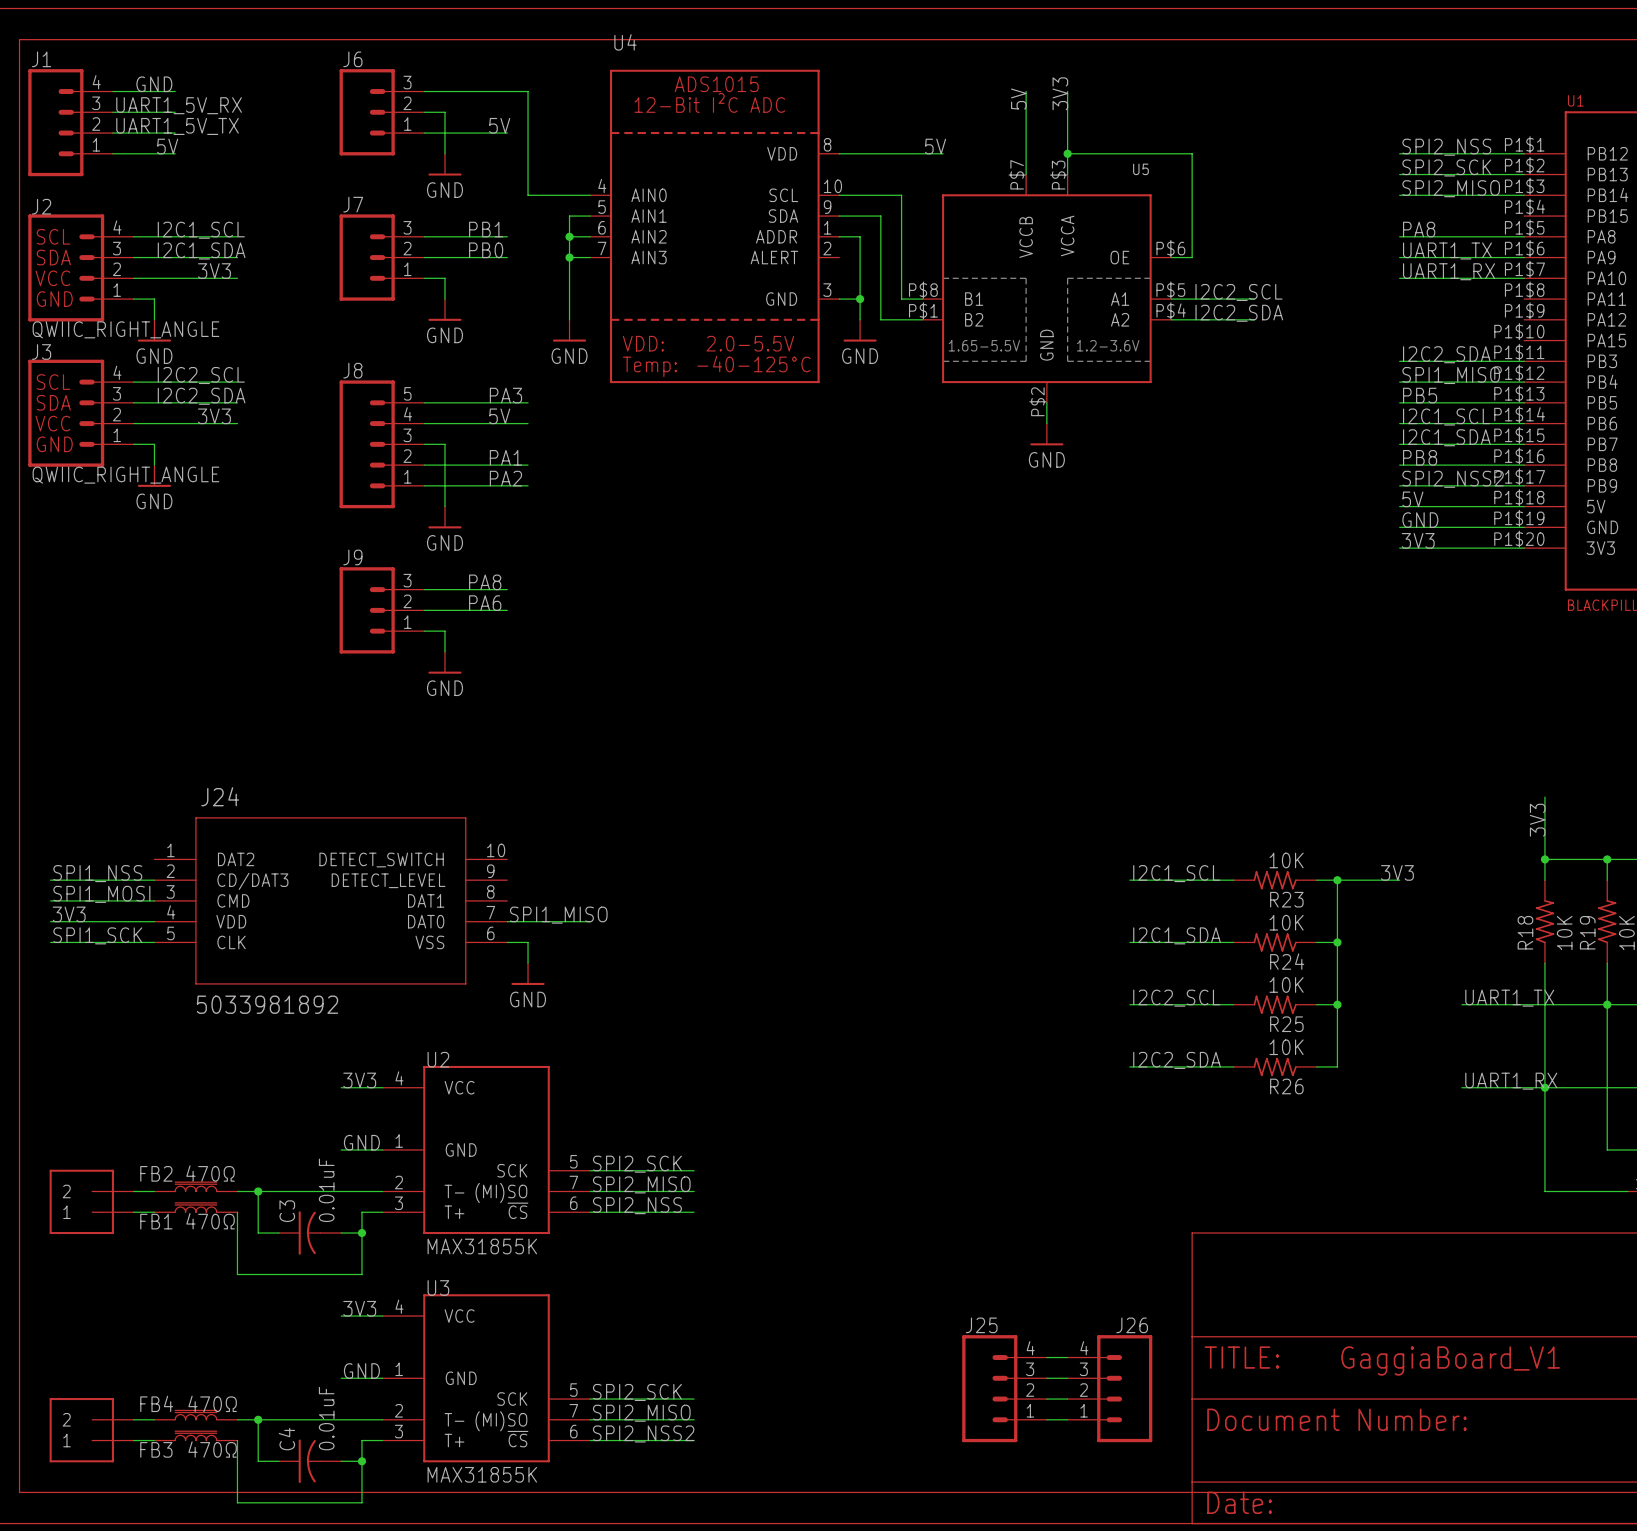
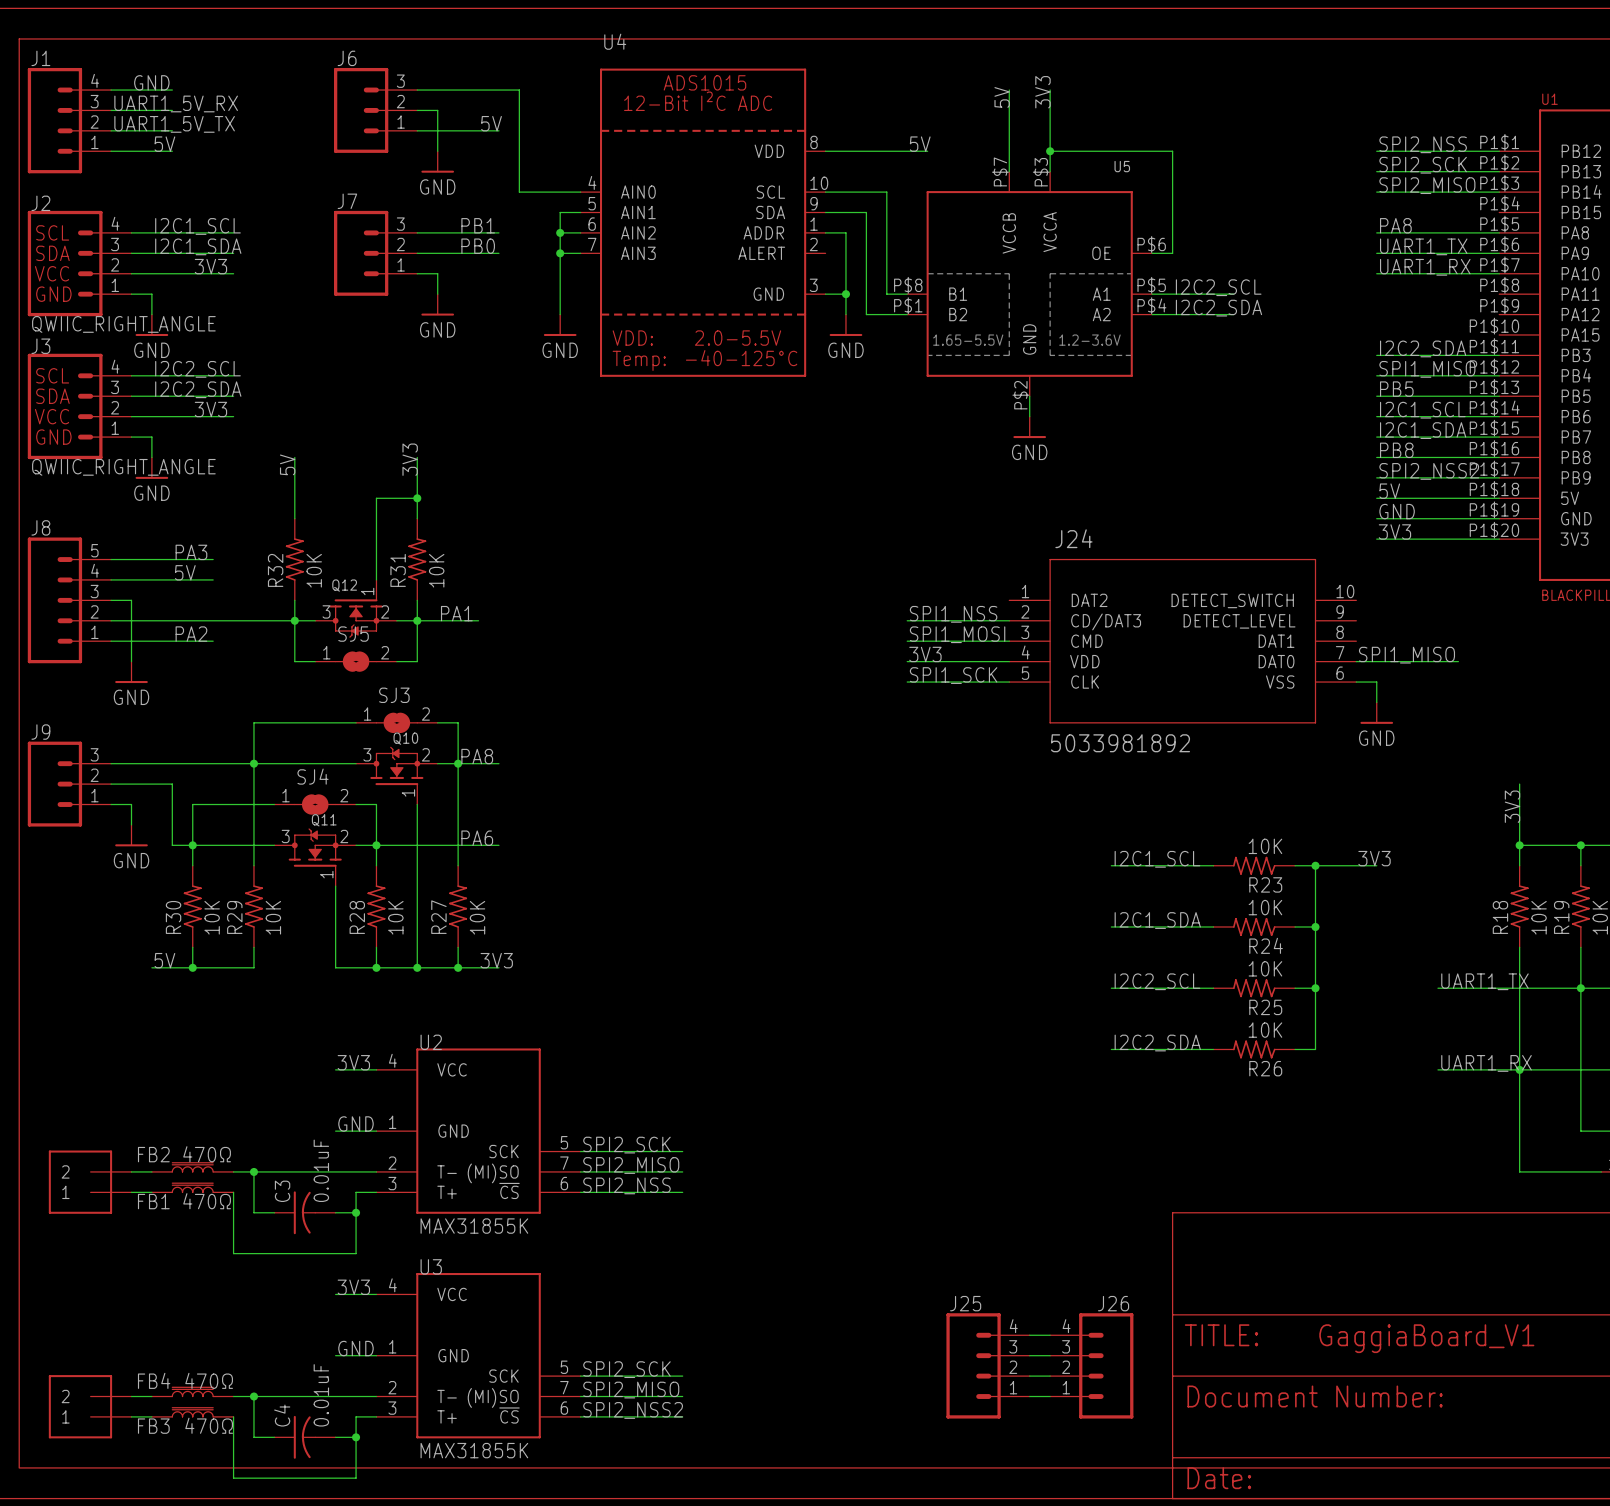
label: PA3 (505, 395) -> none
wire: (424, 402) (528, 402) -> none
label: 5V (499, 416) -> none
wire: (424, 423) (528, 423) -> none
J8 position: (381, 444) -> (69, 600)
wire: (424, 444) (445, 444) (445, 506) -> none
label position: PA1 (505, 457) -> PA1 (456, 613)
wire: none -> (294, 457) (294, 518)
wire: (424, 465) (528, 465) -> (417, 457) (417, 518)
label: none -> 3V3 (410, 459)
label: none -> 5V (287, 464)
label: PA2 (505, 478) -> none
wire: (424, 485) (528, 485) -> none
wire: none -> (417, 498) (376, 498) (376, 579)
junction: none -> (417, 498)
power symbol: GND (445, 517) -> none
label: none -> PA3 (191, 552)
wire: none -> (111, 559) (213, 559)
R32: none -> 10K (294, 559)
R31: none -> 10K (417, 559)
label: none -> 5V (185, 572)
label position: PA8 (485, 582) -> PA8 (477, 756)
wire: none -> (111, 579) (213, 579)
wire: (424, 589) (507, 589) -> none
label: PA6 (485, 603) -> none
wire: none -> (111, 600) (131, 600) (131, 661)
wire: none -> (294, 600) (294, 661) (315, 661)
J9 position: (381, 610) -> (69, 784)
wire: (424, 610) (507, 610) -> (417, 600) (417, 661) (396, 661)
Q12: none -> (356, 608)
label: none -> SPI1_NSS (953, 614)
wire: none -> (111, 620) (315, 620)
junction: none -> (294, 620)
junction: none -> (417, 620)
wire: (445, 631) (445, 651) -> (437, 620) (478, 620)
wire: none -> (907, 620) (1009, 620)
label: none -> PA2 (191, 634)
label: none -> SPI1_MOSI (957, 634)
wire: none -> (111, 641) (213, 641)
wire: none -> (907, 641) (1009, 641)
power symbol: GND (445, 662) -> none
label: none -> 3V3 (925, 654)
label: none -> SPI1_MISO (1406, 655)
SJ5: none -> (356, 661)
wire: none -> (907, 661) (1009, 661)
wire: none -> (1356, 661) (1458, 661)
power symbol: none -> GND (131, 672)
label: none -> SPI1_SCK (953, 675)
wire: none -> (907, 682) (1009, 682)
wire: none -> (1356, 682) (1376, 682) (1376, 702)
power symbol: none -> GND (1376, 713)
wire: none -> (356, 722) (253, 722) (253, 865)
SJ3: none -> (396, 722)
wire: none -> (437, 722) (458, 722) (458, 865)
wire: none -> (111, 763) (356, 763)
junction: none -> (253, 763)
wire: none -> (437, 763) (498, 763)
junction: none -> (458, 763)
Q10: none -> (396, 775)
wire: none -> (111, 784) (172, 784) (172, 845) (274, 845)
wire: none -> (111, 804) (131, 804) (131, 824)
SJ4: none -> (315, 804)
wire: none -> (356, 804) (376, 804) (376, 865)
wire: none -> (417, 804) (417, 967)
power symbol: none -> GND (131, 835)
label: none -> PA6 (477, 838)
junction: none -> (192, 845)
wire: none -> (356, 845) (498, 845)
junction: none -> (376, 845)
Q11: none -> (315, 857)
label: SPI1_NSS (97, 873) -> none
wire: (50, 880) (154, 880) -> none
label: SPI1_MOSI (101, 894) -> none
wire: (50, 900) (154, 900) -> none
J24 position: (330, 900) -> (1182, 641)
wire: none -> (335, 886) (335, 967) (498, 967)
label: 3V3 (69, 914) -> none
label: SPI1_MISO (558, 915) -> none
wire: (50, 921) (154, 921) -> none
R30: none -> 10K (192, 906)
R29: none -> 10K (253, 906)
R28: none -> 10K (376, 906)
R27: none -> 10K (458, 906)
wire: (507, 921) (590, 921) -> none
label: SPI1_SCK (97, 935) -> none
wire: (50, 942) (154, 942) -> none
wire: (507, 942) (528, 942) (528, 963) -> none
wire: none -> (253, 947) (253, 967) (151, 967)
wire: none -> (376, 947) (376, 967)
power symbol: GND (528, 974) -> none
label: none -> 5V (164, 960)
label: none -> 3V3 (496, 960)
junction: none -> (192, 967)
junction: none -> (376, 967)
junction: none -> (417, 967)
junction: none -> (458, 967)

